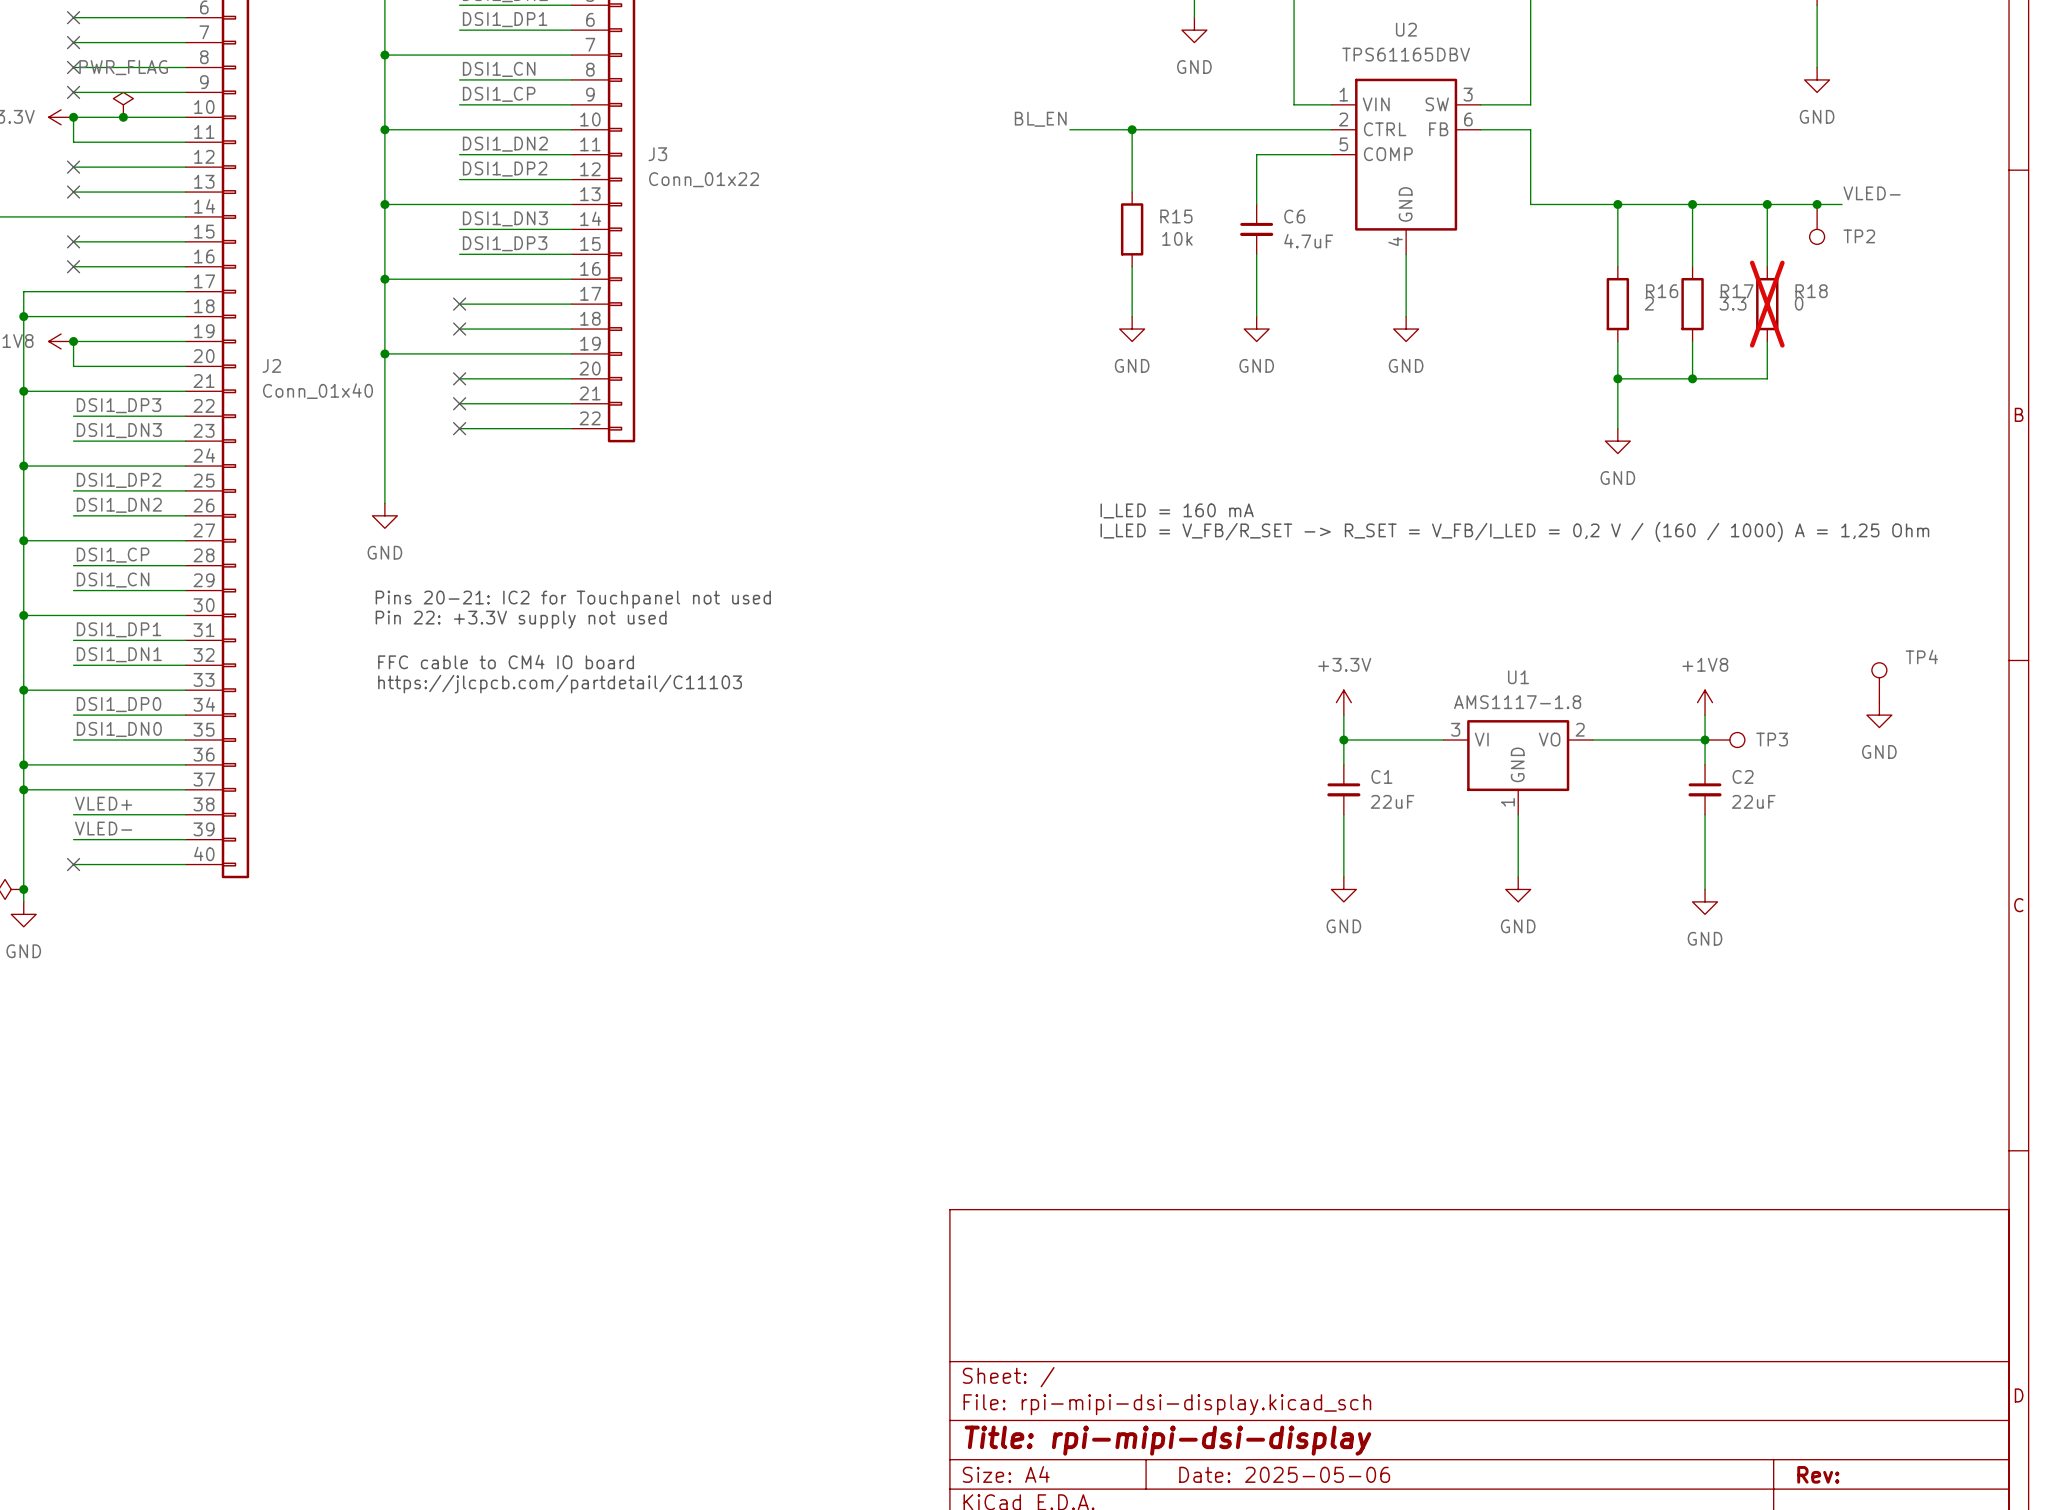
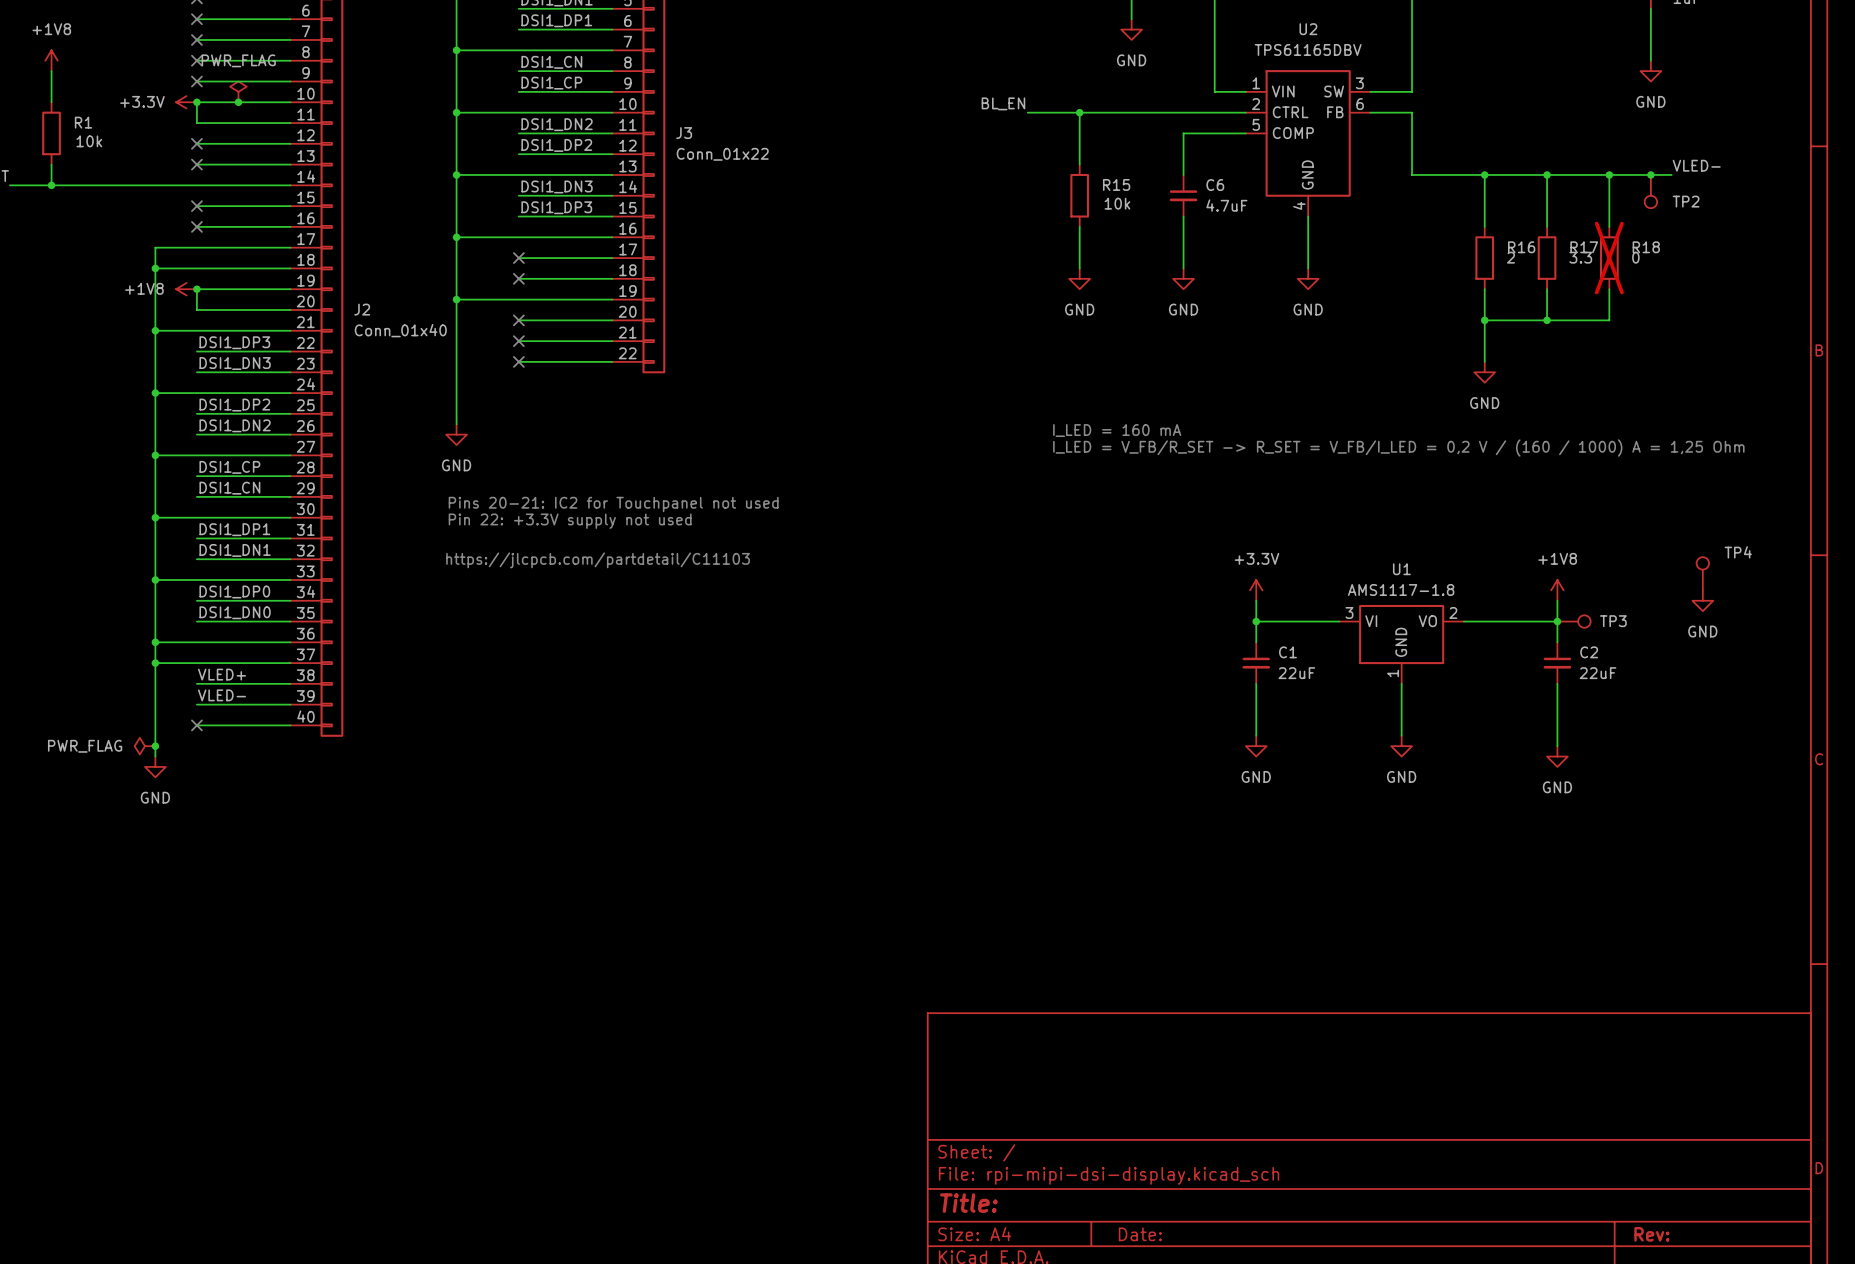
text: FFC cable to CM4 IO board (506, 662) -> none
text position: https://jlcpcb.com/partdetail/C11103 (560, 684) -> https://jlcpcb.com/partdetail/C11103 (598, 560)
title block: Title: rpi-mipi-dsi-display (1167, 1440) -> Title: (968, 1203)
title block: Date: 2025-05-06 (1284, 1474) -> Date: (1140, 1234)

